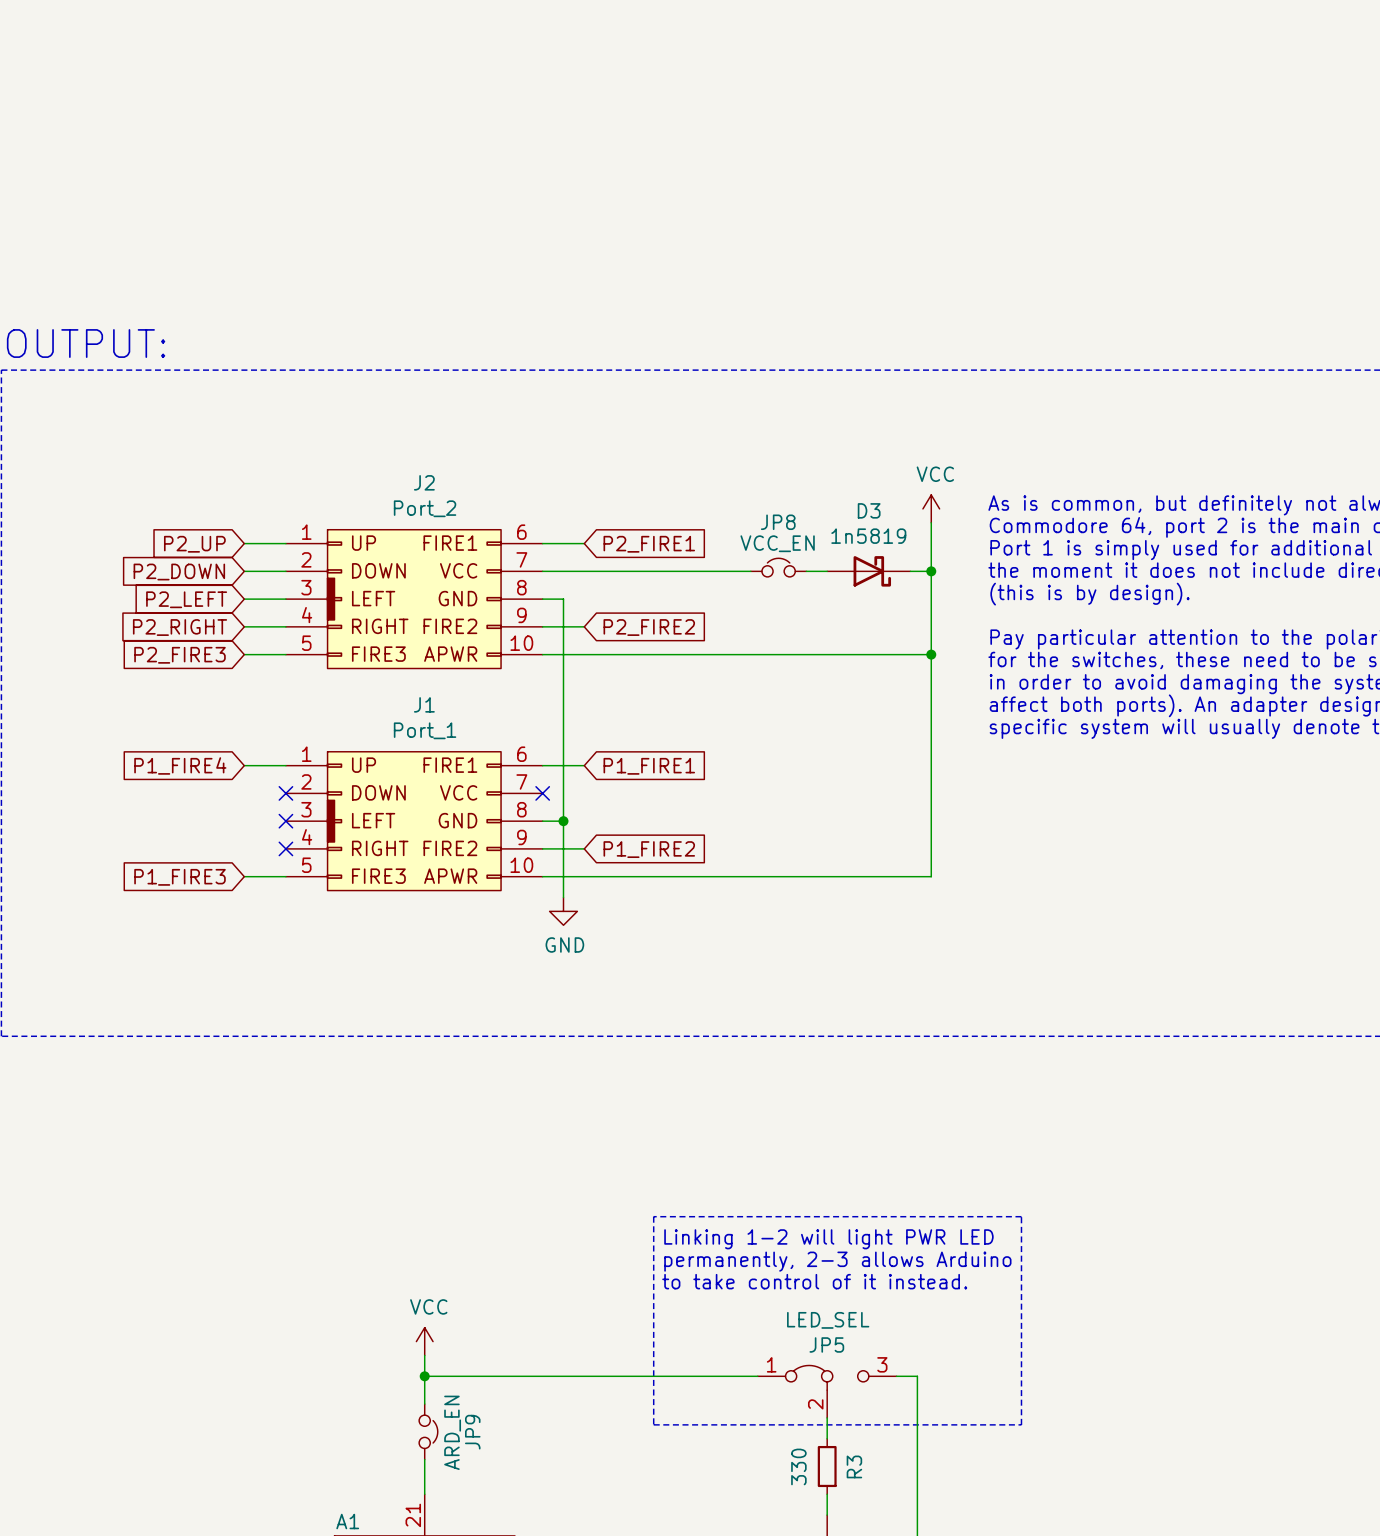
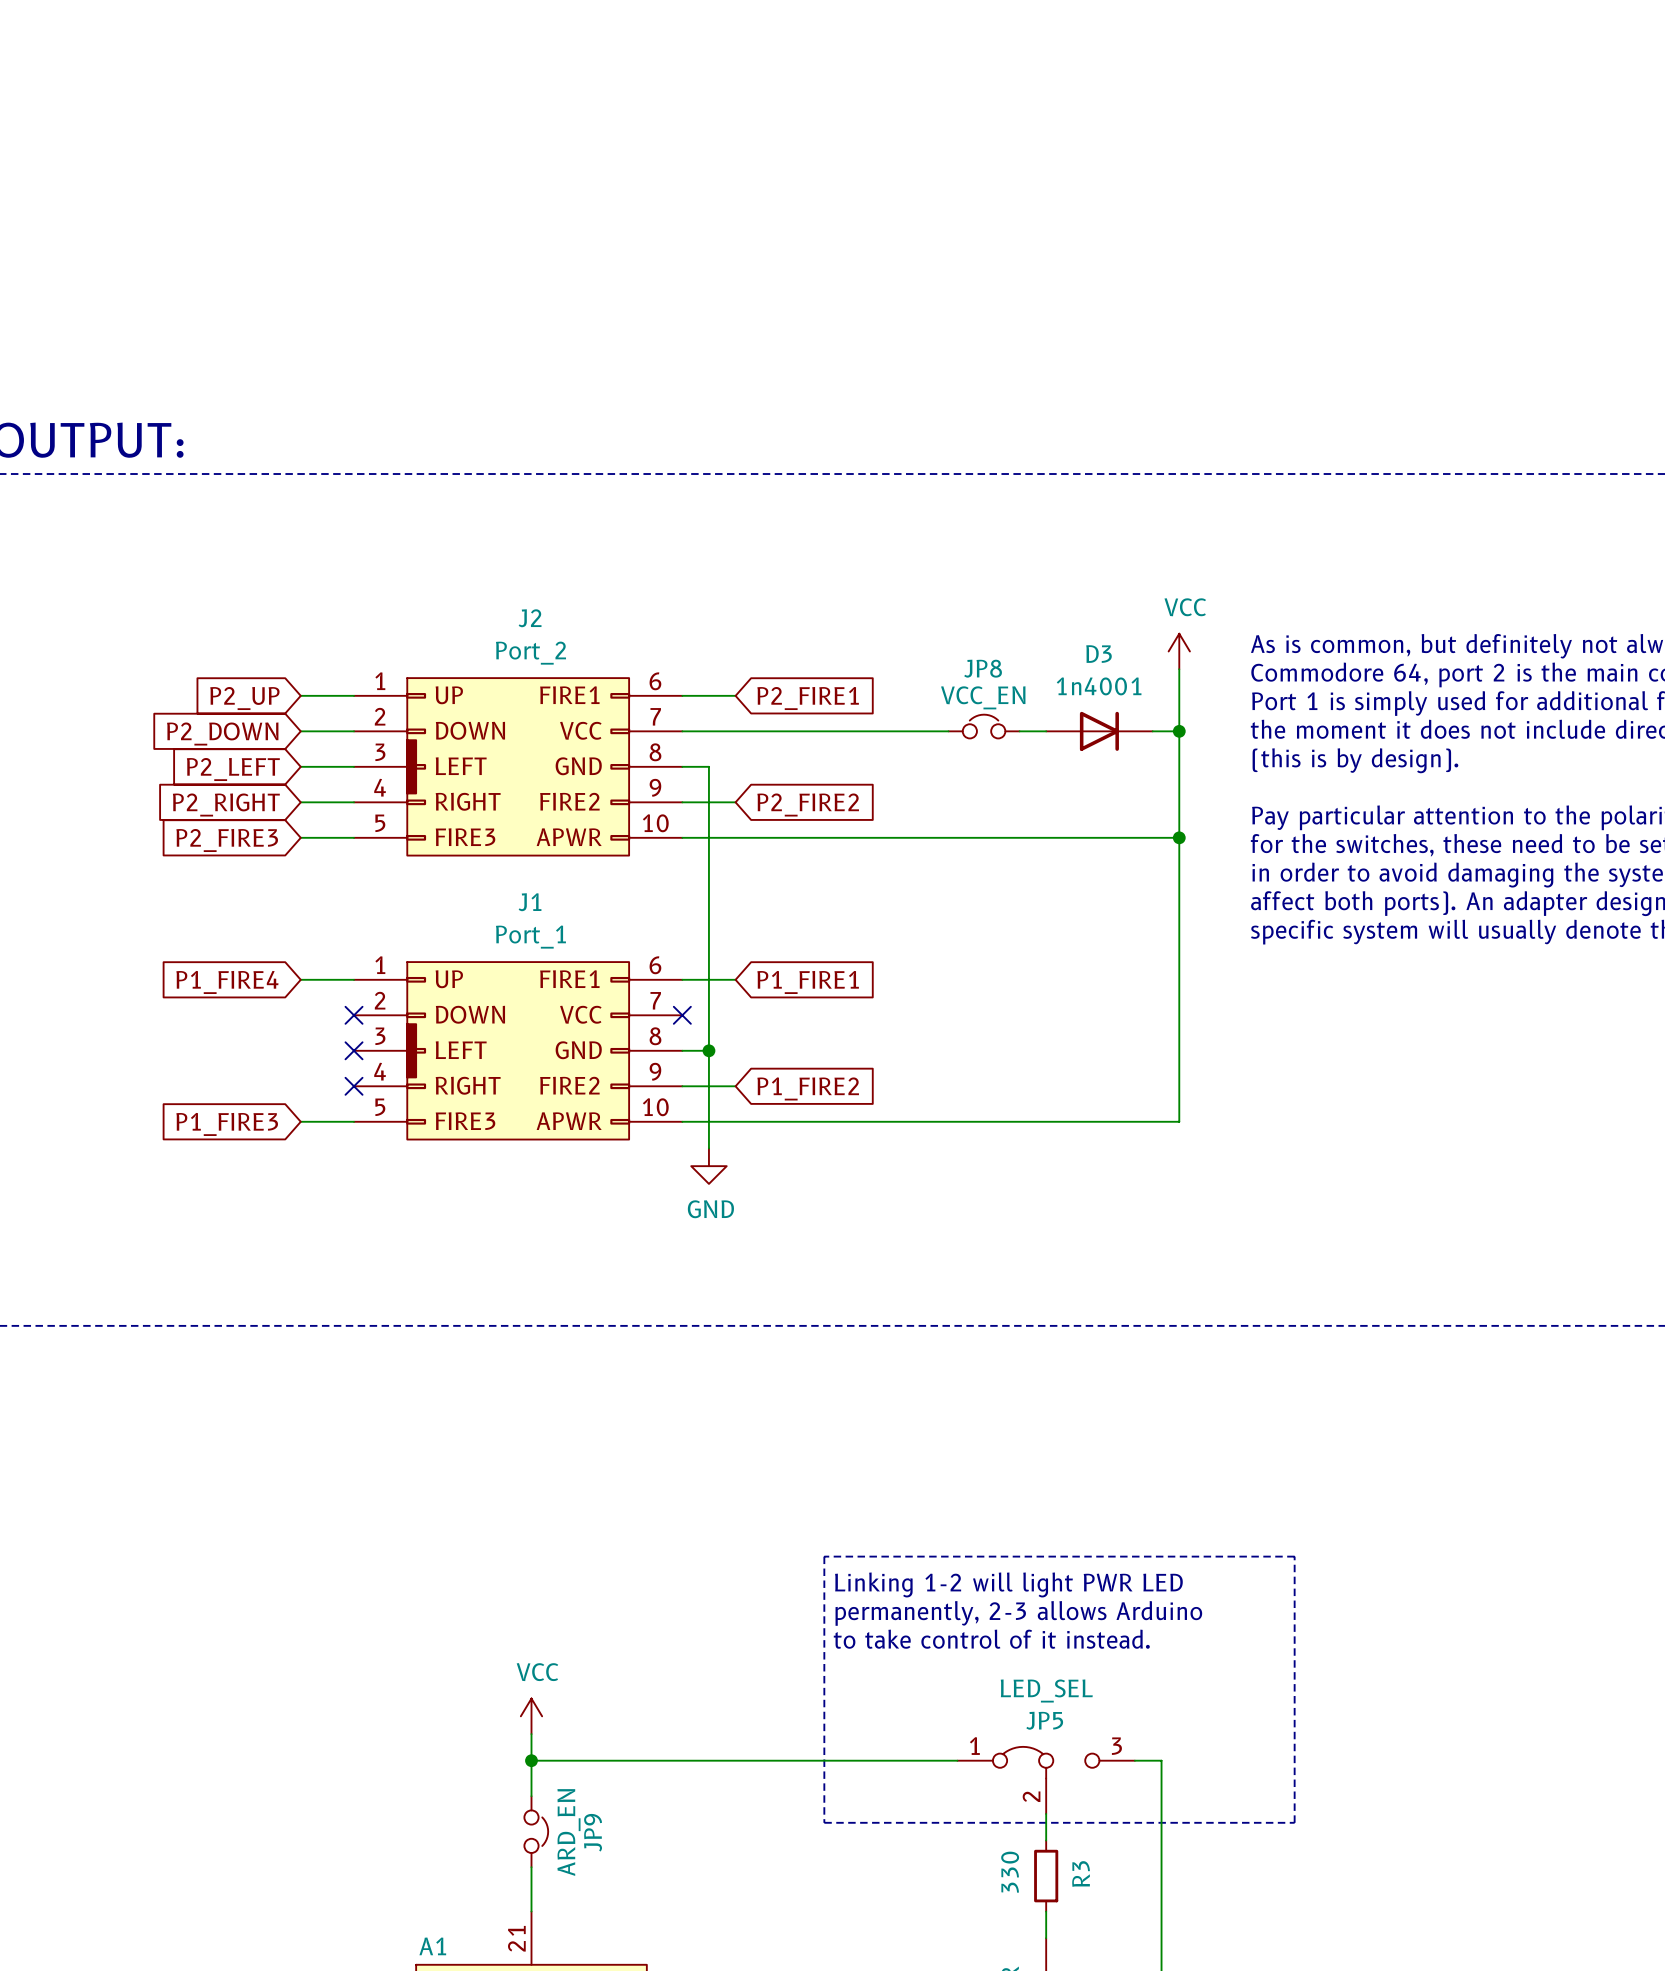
D3 value: 1n5819 (868, 536) -> 1n4001 (1099, 686)
D3 symbol: [827, 556, 911, 587] -> [1046, 711, 1153, 751]

